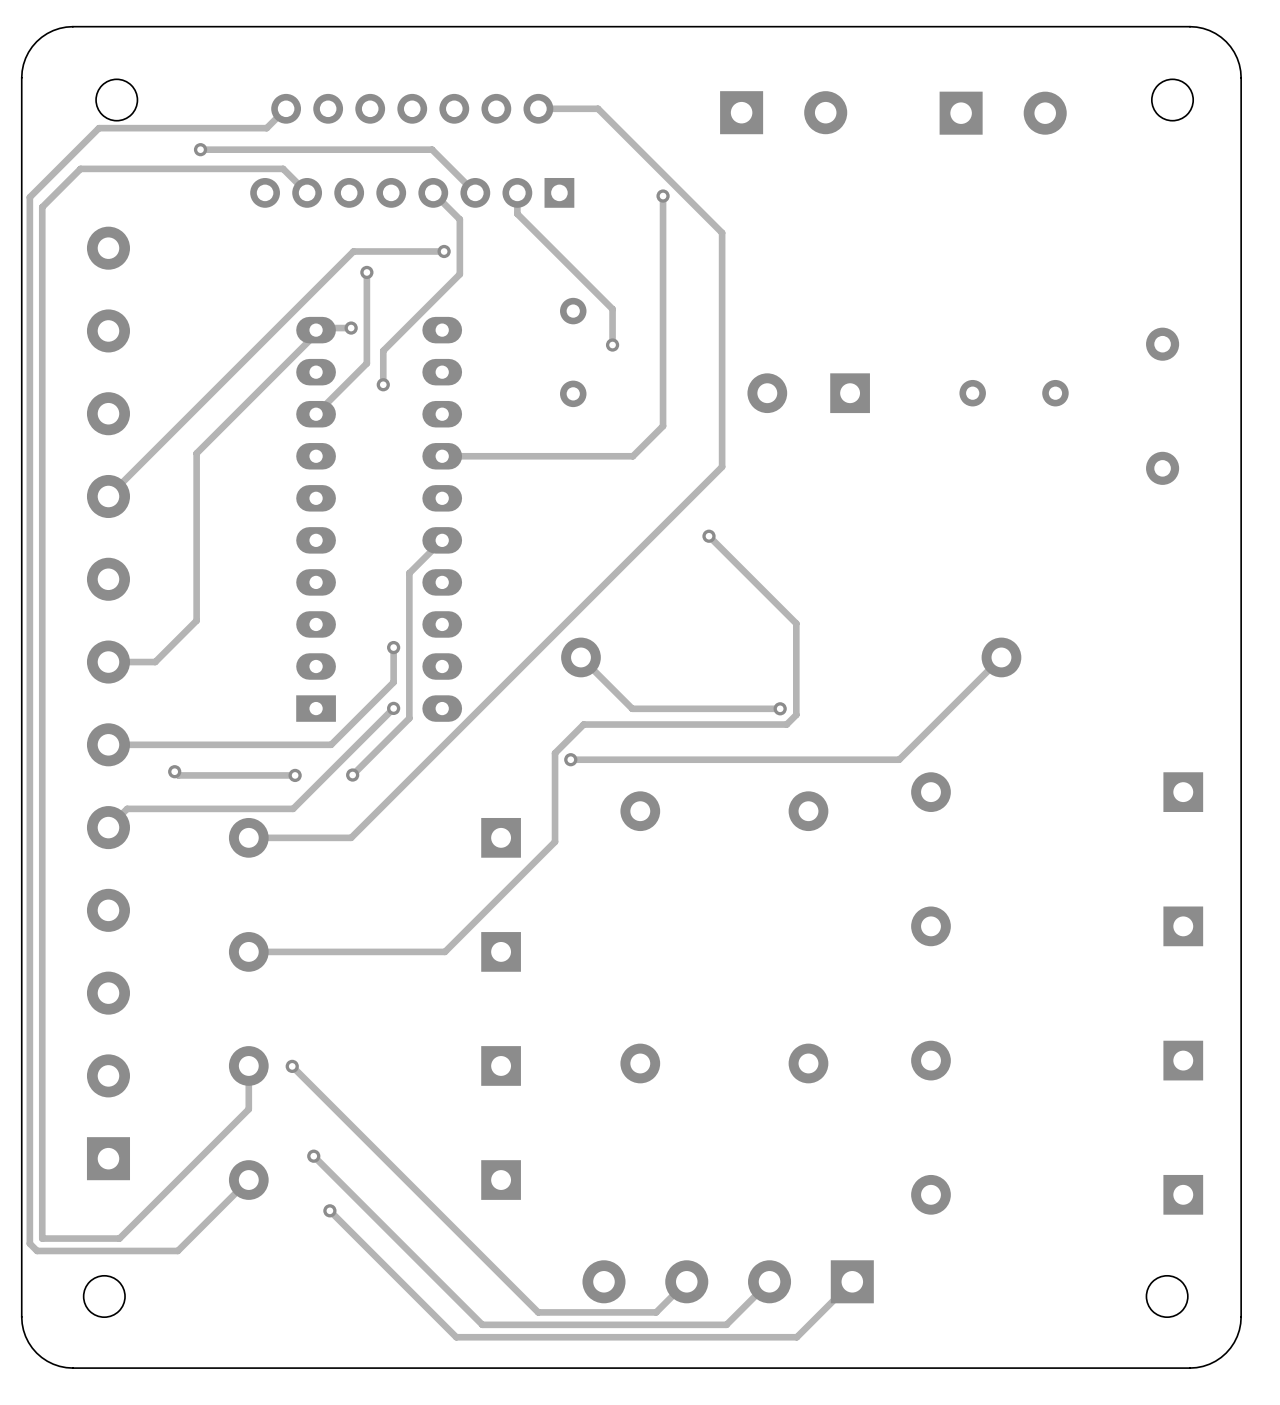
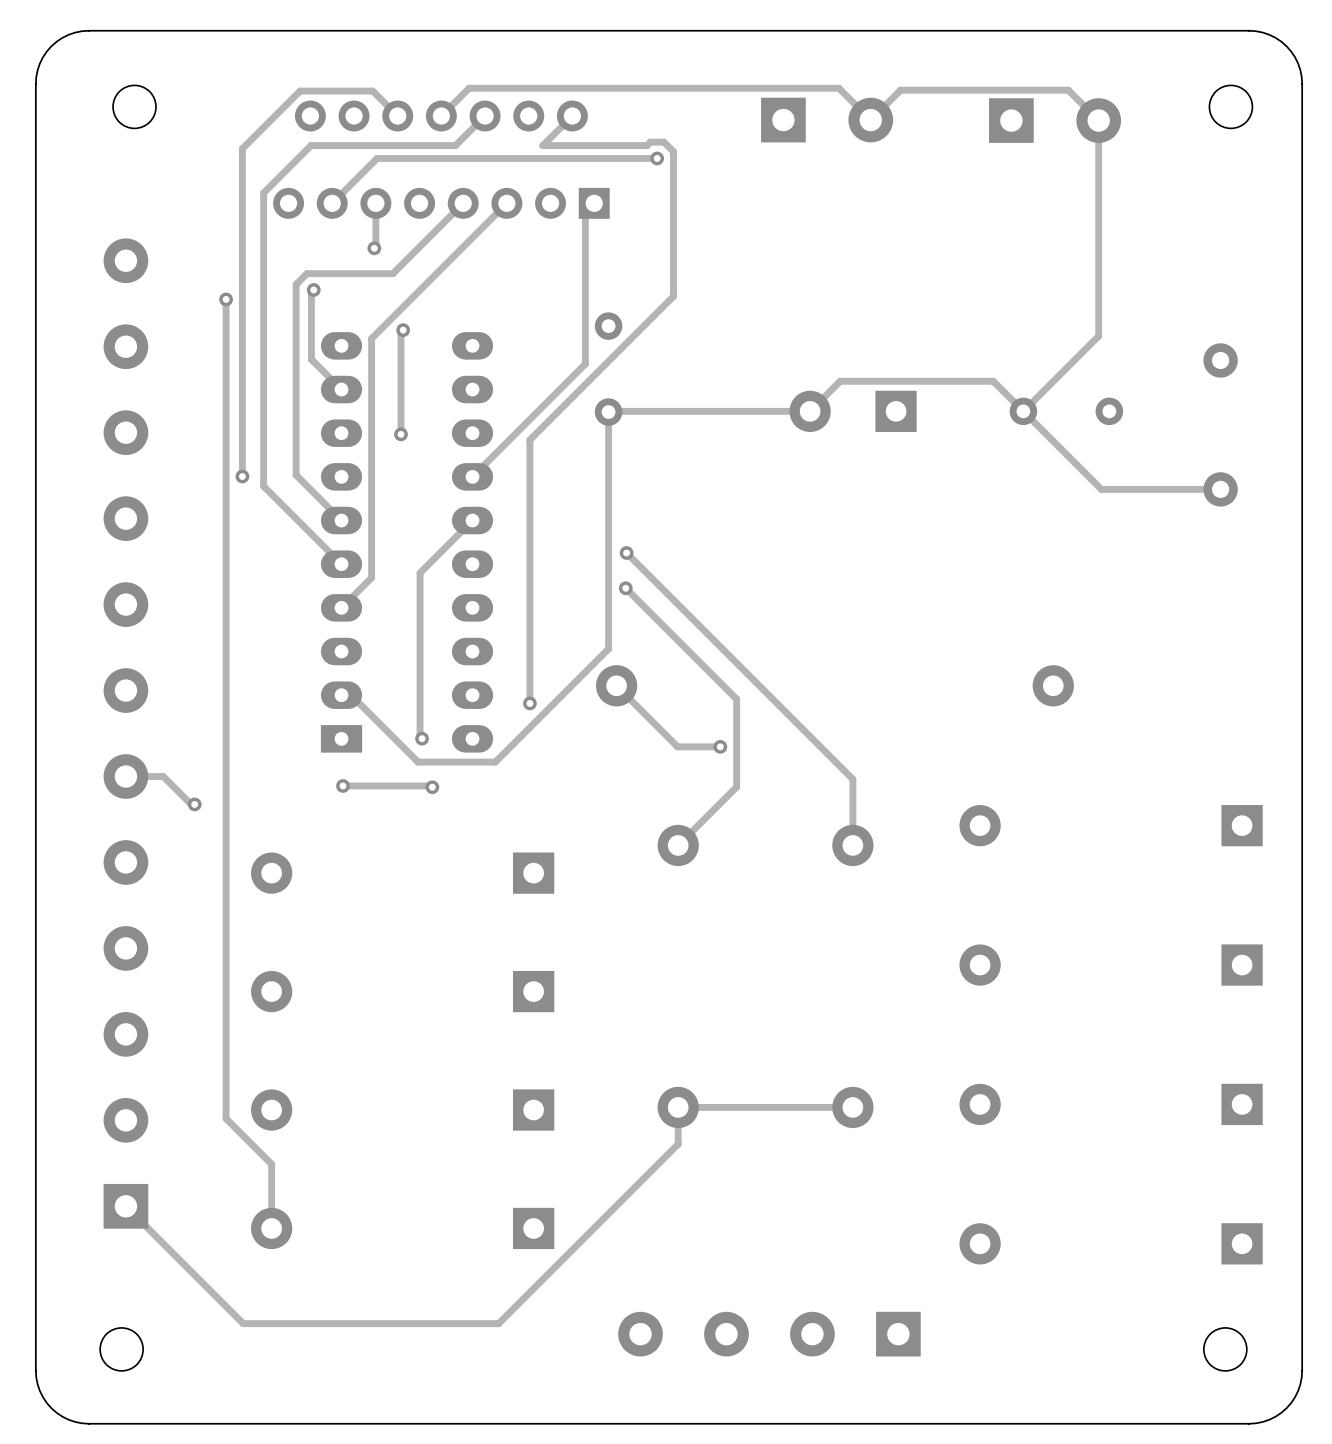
track: (286, 108) (266, 128) (98, 128) (29, 197) (29, 1243) (37, 1250) (177, 1250) (248, 1180) -> (226, 299) (226, 1118) (271, 1164) (271, 1228)
track: none -> (397, 116) (372, 91) (300, 91) (242, 148) (242, 476)
track: none -> (441, 116) (469, 88) (838, 88) (870, 120) (900, 90) (1068, 90) (1098, 120) (1098, 336) (1023, 411)
track: none -> (485, 116) (455, 145) (311, 145) (263, 193) (263, 486) (341, 564)
track: (538, 108) (598, 108) (722, 232) (722, 466) (351, 837) (248, 837) -> (572, 116) (542, 145) (646, 145) (650, 142) (663, 142) (673, 151) (673, 296) (529, 439) (529, 703)
via: (200, 149) -> none
track: (350, 149) (200, 149) -> (377, 158) (332, 203)
track: (432, 149) (475, 192) -> (462, 158) (657, 158)
track: (307, 192) (283, 168) (80, 168) (42, 207) (42, 1238) (119, 1238) (248, 1109) (248, 1065) -> none
track: none -> (375, 203) (374, 248)
track: (433, 192) (459, 219) (459, 274) (383, 350) (383, 384) -> (463, 203) (392, 273) (306, 273) (296, 284) (296, 475) (341, 520)
track: none -> (506, 203) (371, 338) (371, 577) (341, 607)
track: (517, 192) (517, 213) (612, 309) (612, 345) -> none
track: (663, 196) (663, 426) (632, 456) (442, 456) -> (585, 212) (585, 363) (472, 476)
via position: (663, 196) -> (657, 158)
via: none -> (374, 248)
track: (444, 251) (353, 251) (108, 496) -> none
via: (444, 251) -> none
track: (366, 272) (366, 363) (316, 414) -> none
via: (366, 272) -> none
track: none -> (313, 289) (311, 292) (311, 359) (341, 389)
via: none -> (313, 289)
via: none -> (226, 299)
track: none -> (403, 330) (400, 332) (400, 434)
via: none -> (403, 330)
track: (351, 328) (321, 328) (196, 453) (196, 620) (155, 662) (108, 662) -> none
via: (351, 328) -> none
via: (612, 345) -> none
via position: (383, 384) -> (400, 434)
track: none -> (609, 411) (810, 411) (840, 381) (993, 381) (1101, 489) (1220, 489)
track: none -> (608, 412) (608, 648) (495, 762) (418, 762) (351, 695)
via: none -> (242, 476)
track: none -> (472, 520) (420, 572) (420, 736)
track: none -> (626, 553) (852, 779) (852, 845)
via: none -> (626, 553)
track: (708, 536) (796, 623) (796, 714) (786, 724) (583, 724) (555, 753) (555, 841) (444, 951) (248, 951) -> none
via: (708, 536) -> none
track: (442, 540) (409, 573) (409, 718) (352, 775) -> none
track: none -> (625, 588) (736, 699) (736, 786) (678, 845)
via: none -> (625, 588)
track: (393, 647) (393, 682) (331, 744) (144, 744) -> (189, 803) (163, 776)
via: (393, 647) -> none
track: (1001, 657) (899, 759) (570, 759) -> none
via: none -> (529, 703)
track: (393, 708) (293, 808) (127, 808) (108, 827) -> none
track: (780, 708) (632, 708) -> (720, 746) (677, 746) (669, 739)
via: (780, 708) -> none
via: none -> (720, 746)
track: none -> (342, 785) (432, 787)
via: none -> (342, 785)
via: none -> (432, 787)
via: (570, 759) -> none
track: (174, 771) (178, 775) (295, 775) -> none
via: (295, 775) -> none
via: (352, 775) -> none
track: none -> (852, 1107) (678, 1107) (678, 1144) (498, 1323) (243, 1323) (125, 1206)
track: (292, 1066) (538, 1312) (656, 1312) (686, 1281) -> none
via: (292, 1066) -> none
track: (313, 1156) (482, 1324) (726, 1324) (769, 1281) -> none
via: (313, 1156) -> none
track: (329, 1210) (456, 1337) (796, 1337) (852, 1281) -> none
via: (329, 1210) -> none

